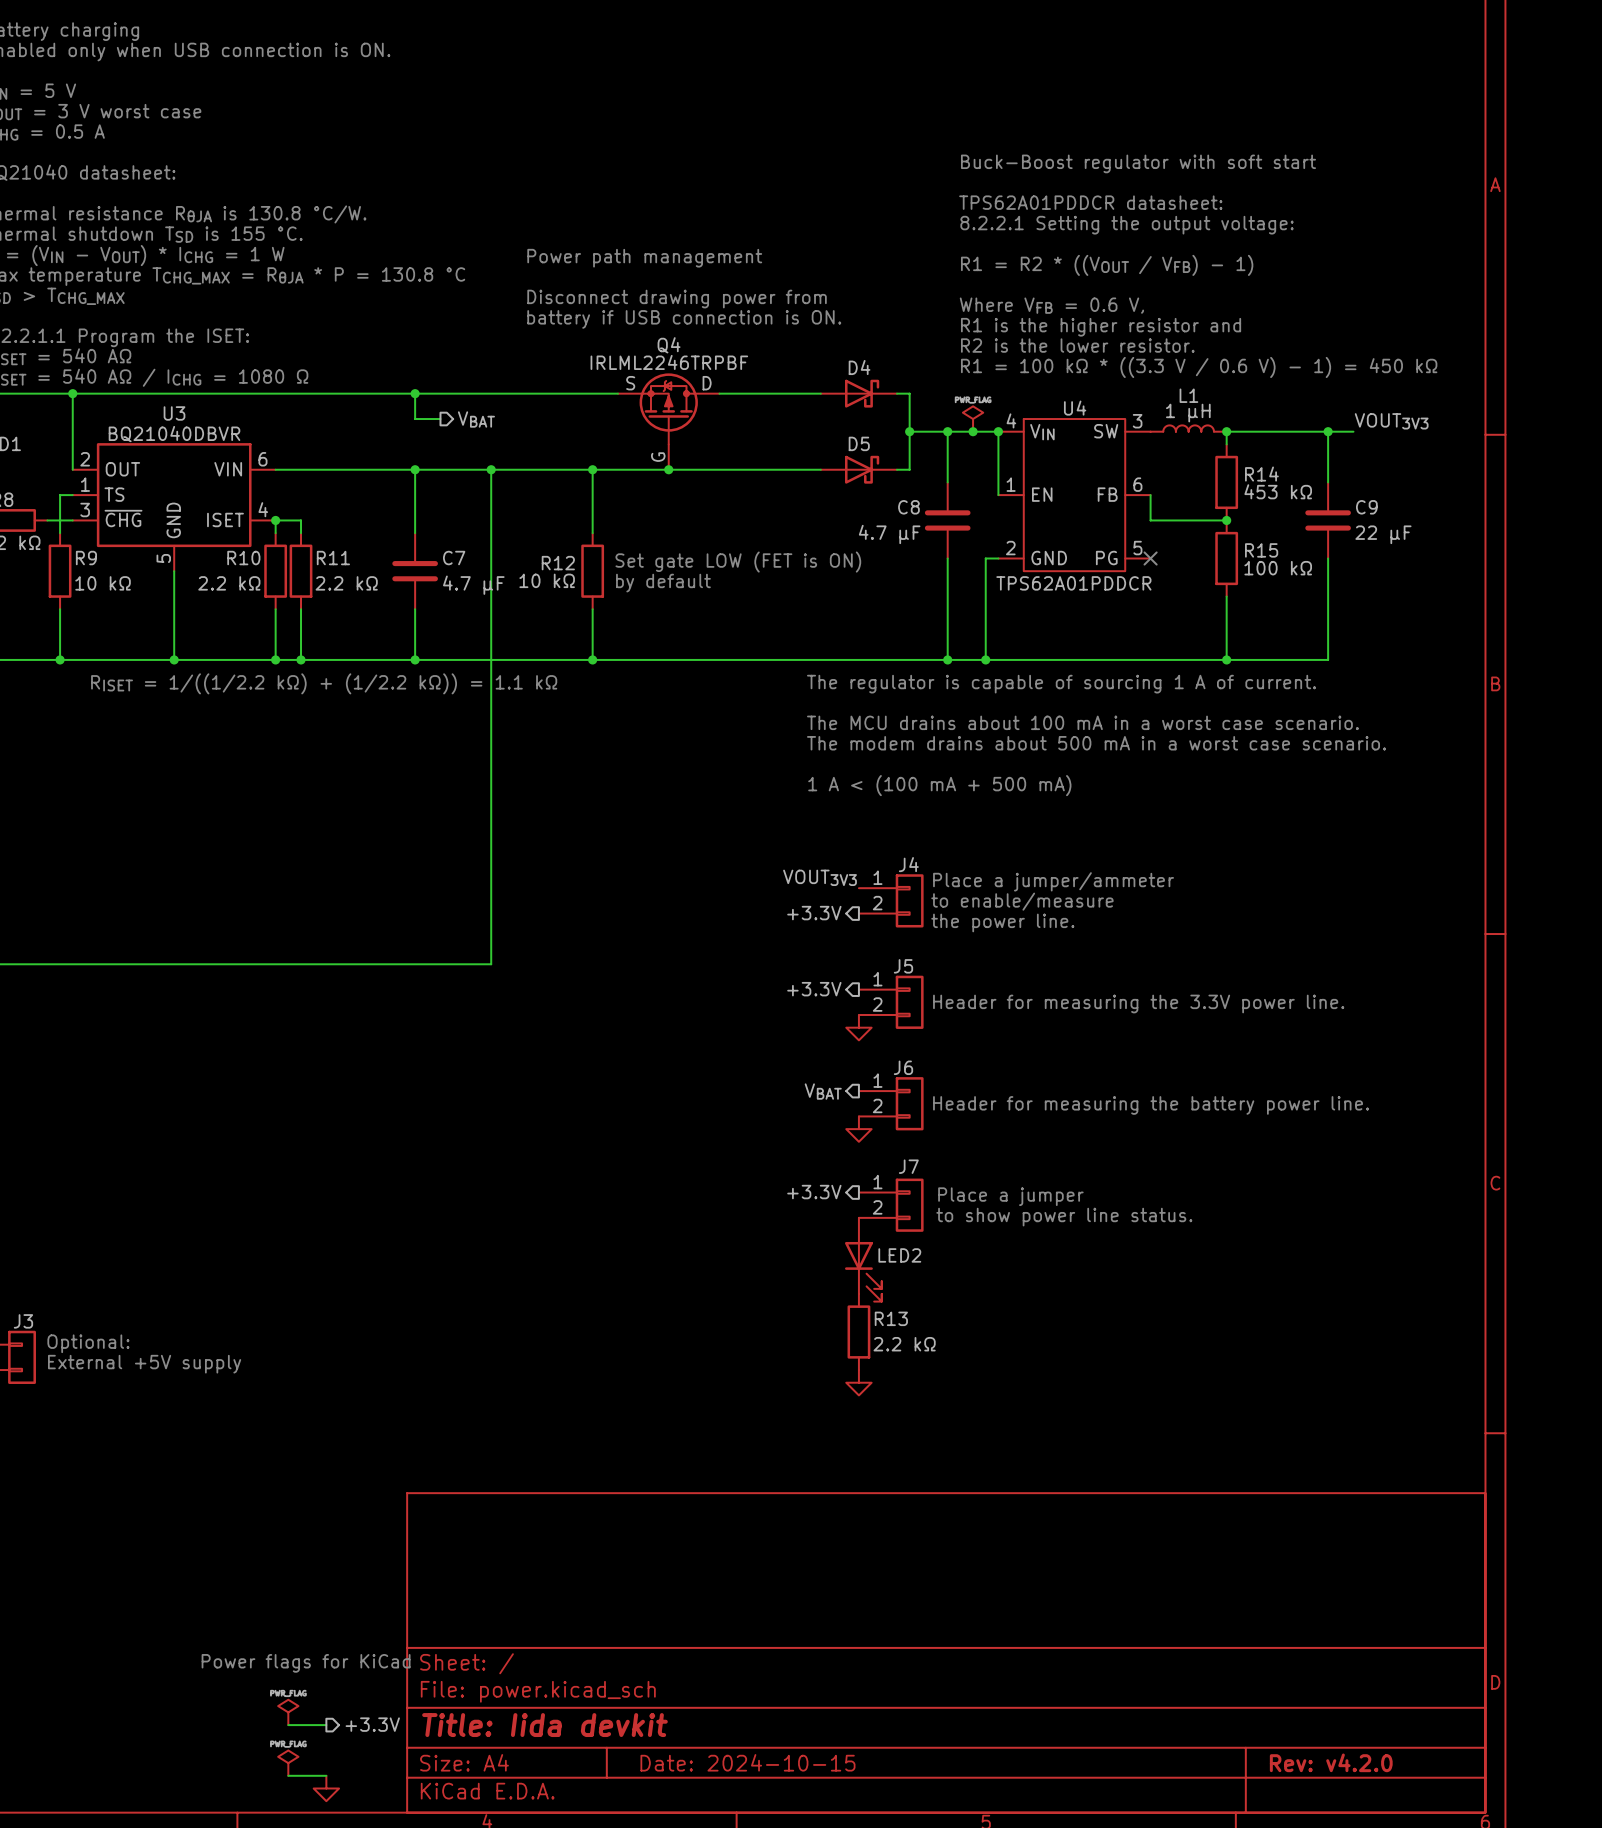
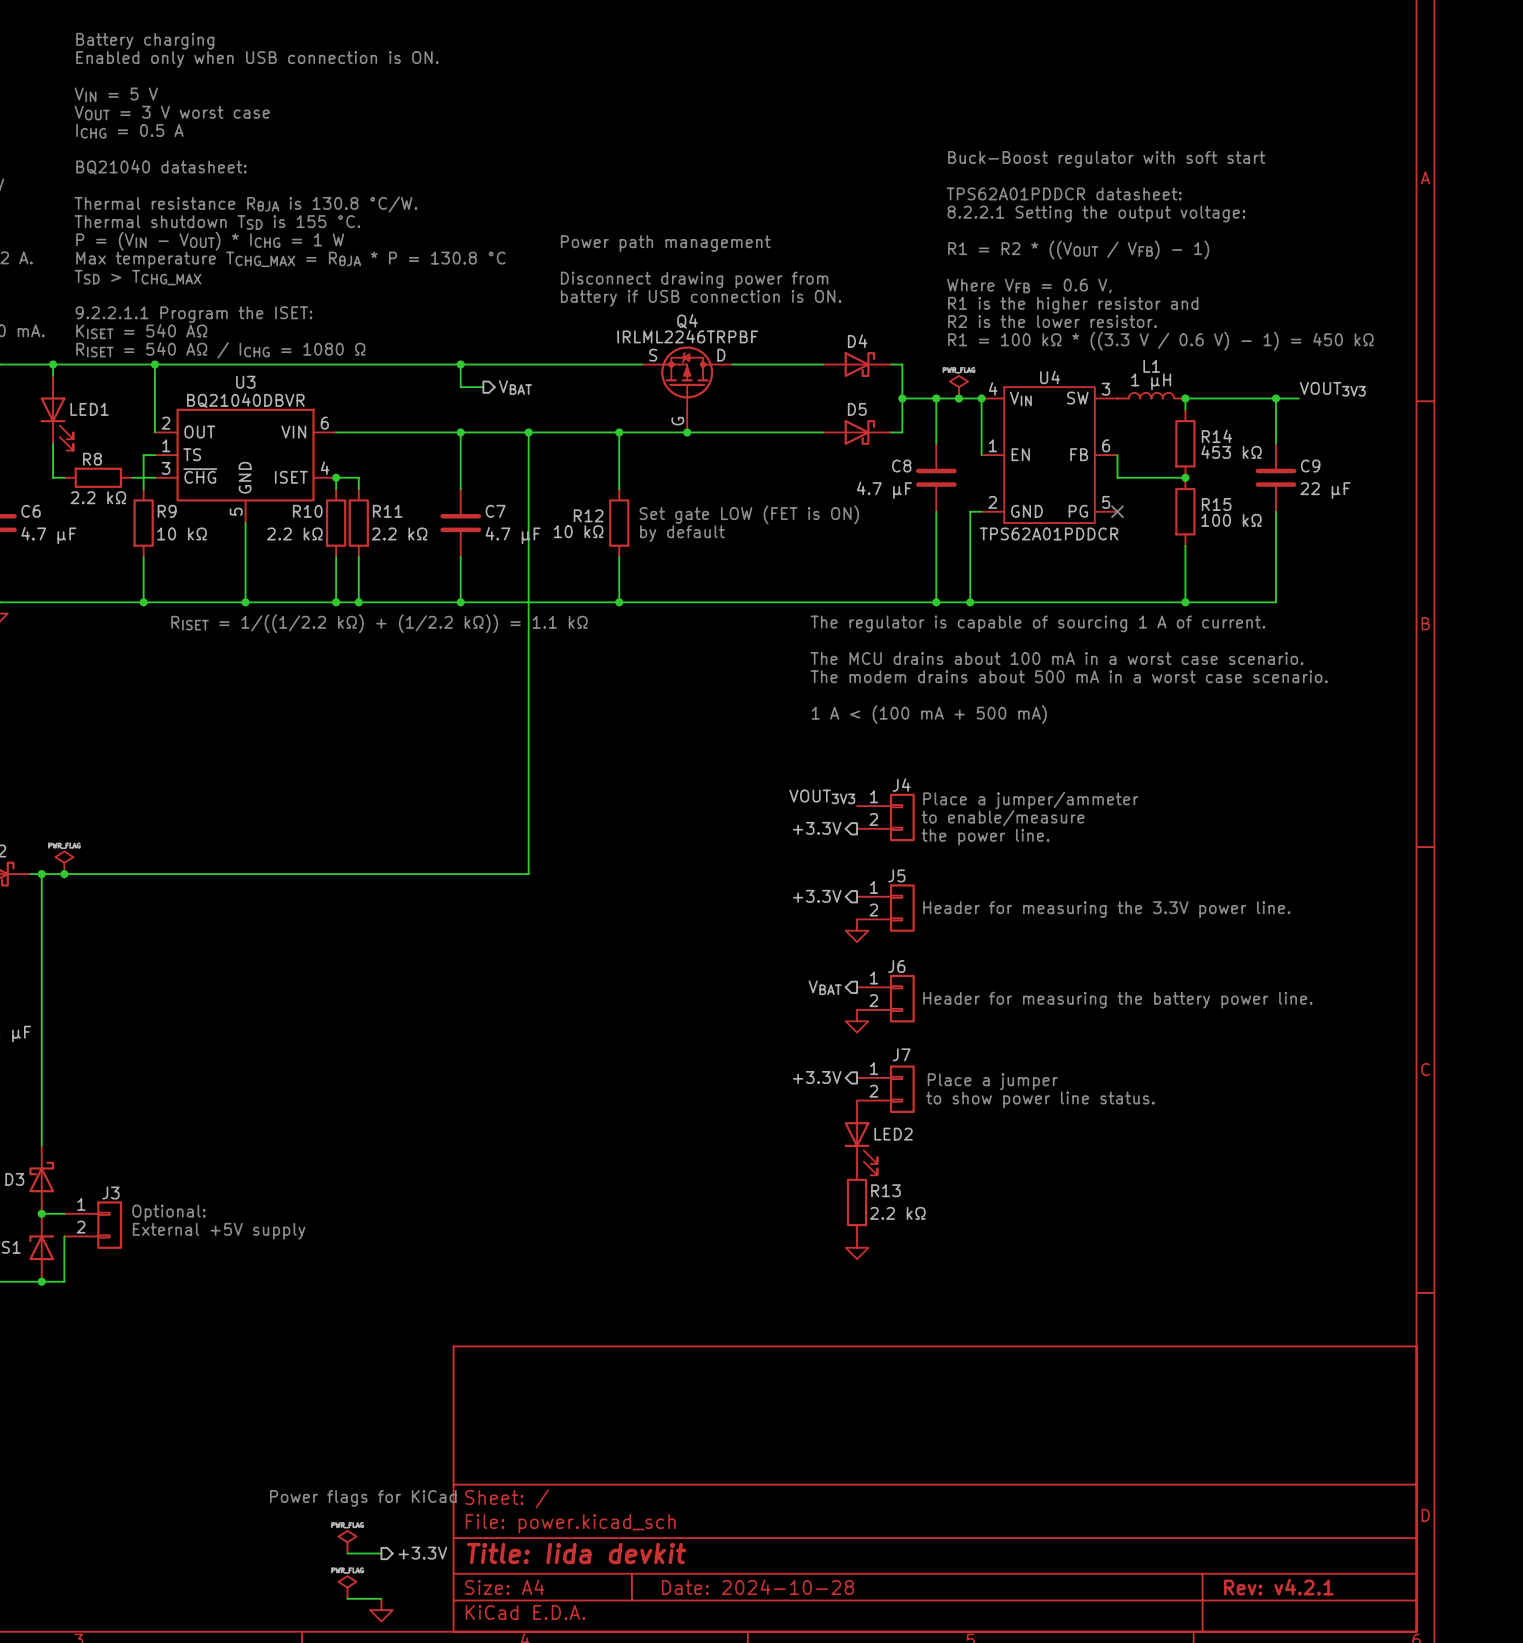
title block: Date: 2024-10-15 (747, 1762) -> Date: 2024-10-28 (757, 1587)
title block: Rev: v4.2.0 (1331, 1762) -> Rev: v4.2.1 (1278, 1587)

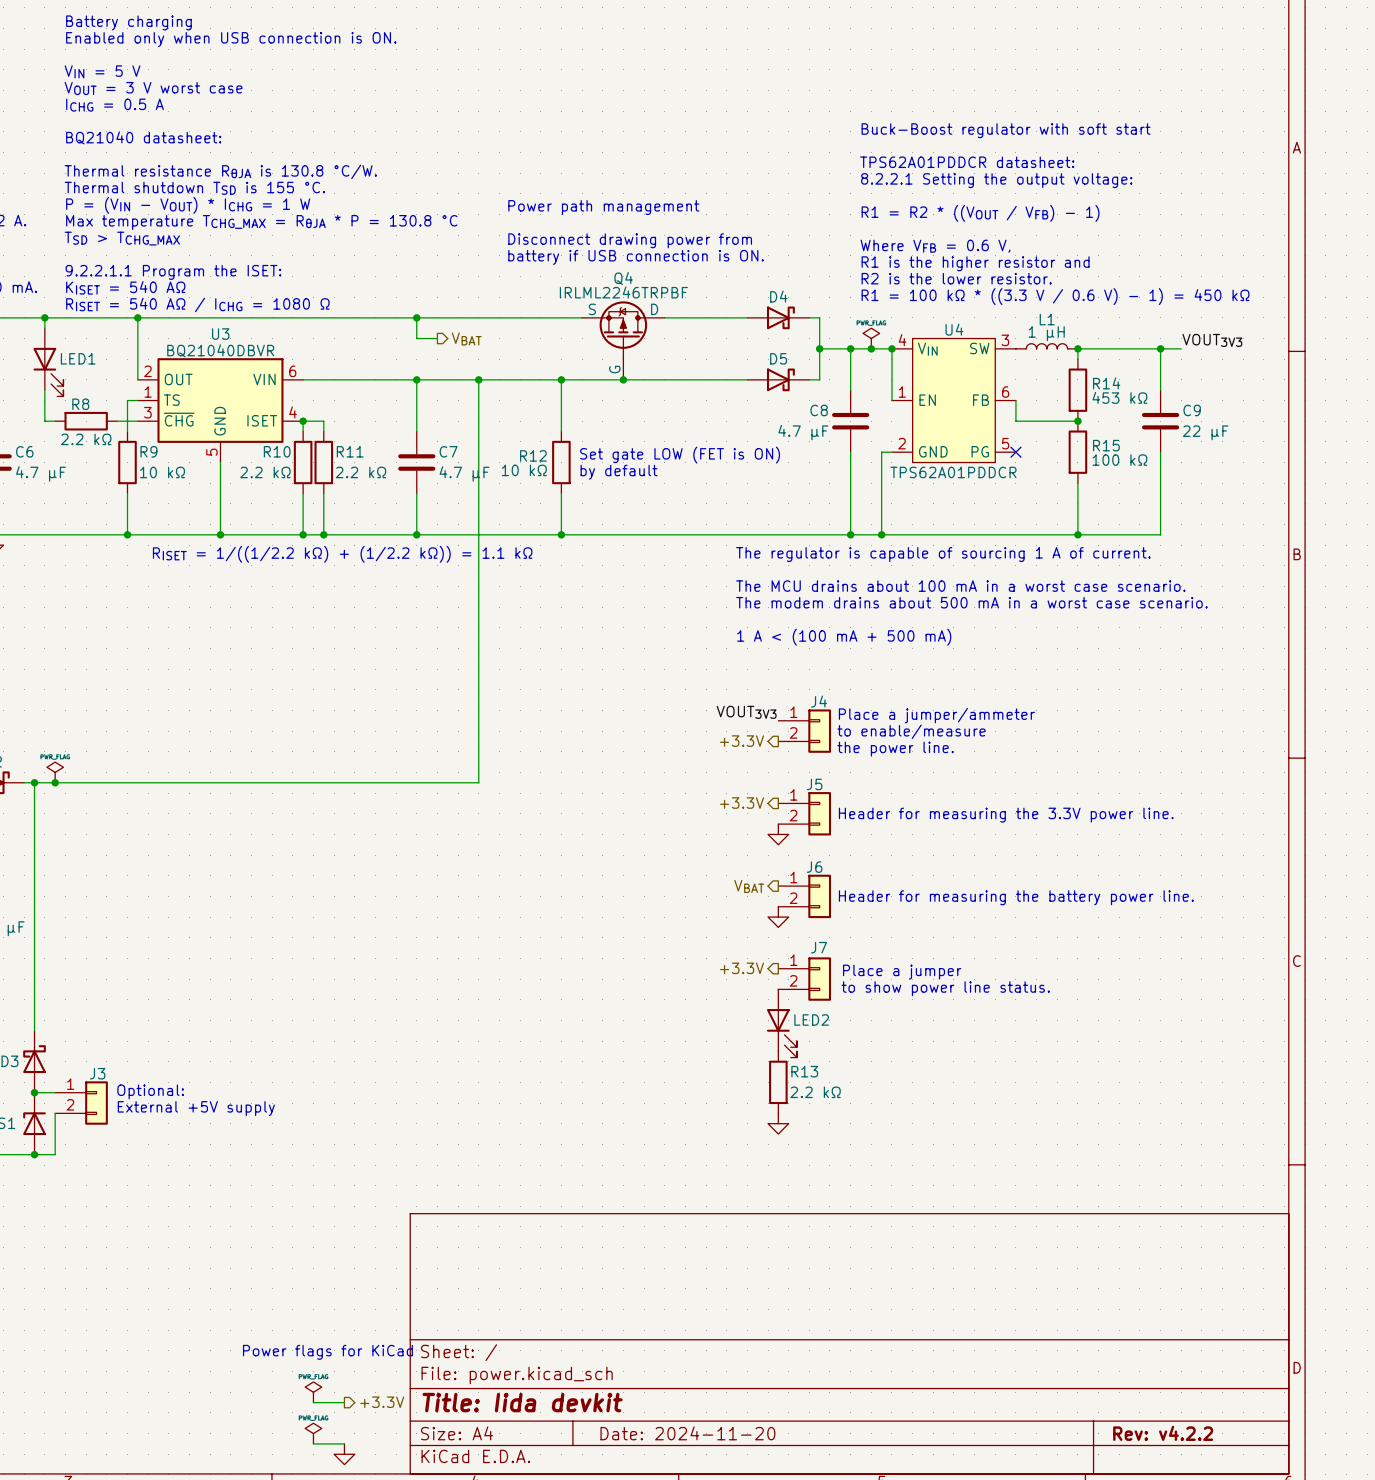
title block: Date: 2024-10-28 (757, 1587) -> Date: 2024-11-20 (687, 1433)
title block: Rev: v4.2.1 (1278, 1587) -> Rev: v4.2.2 (1163, 1433)

